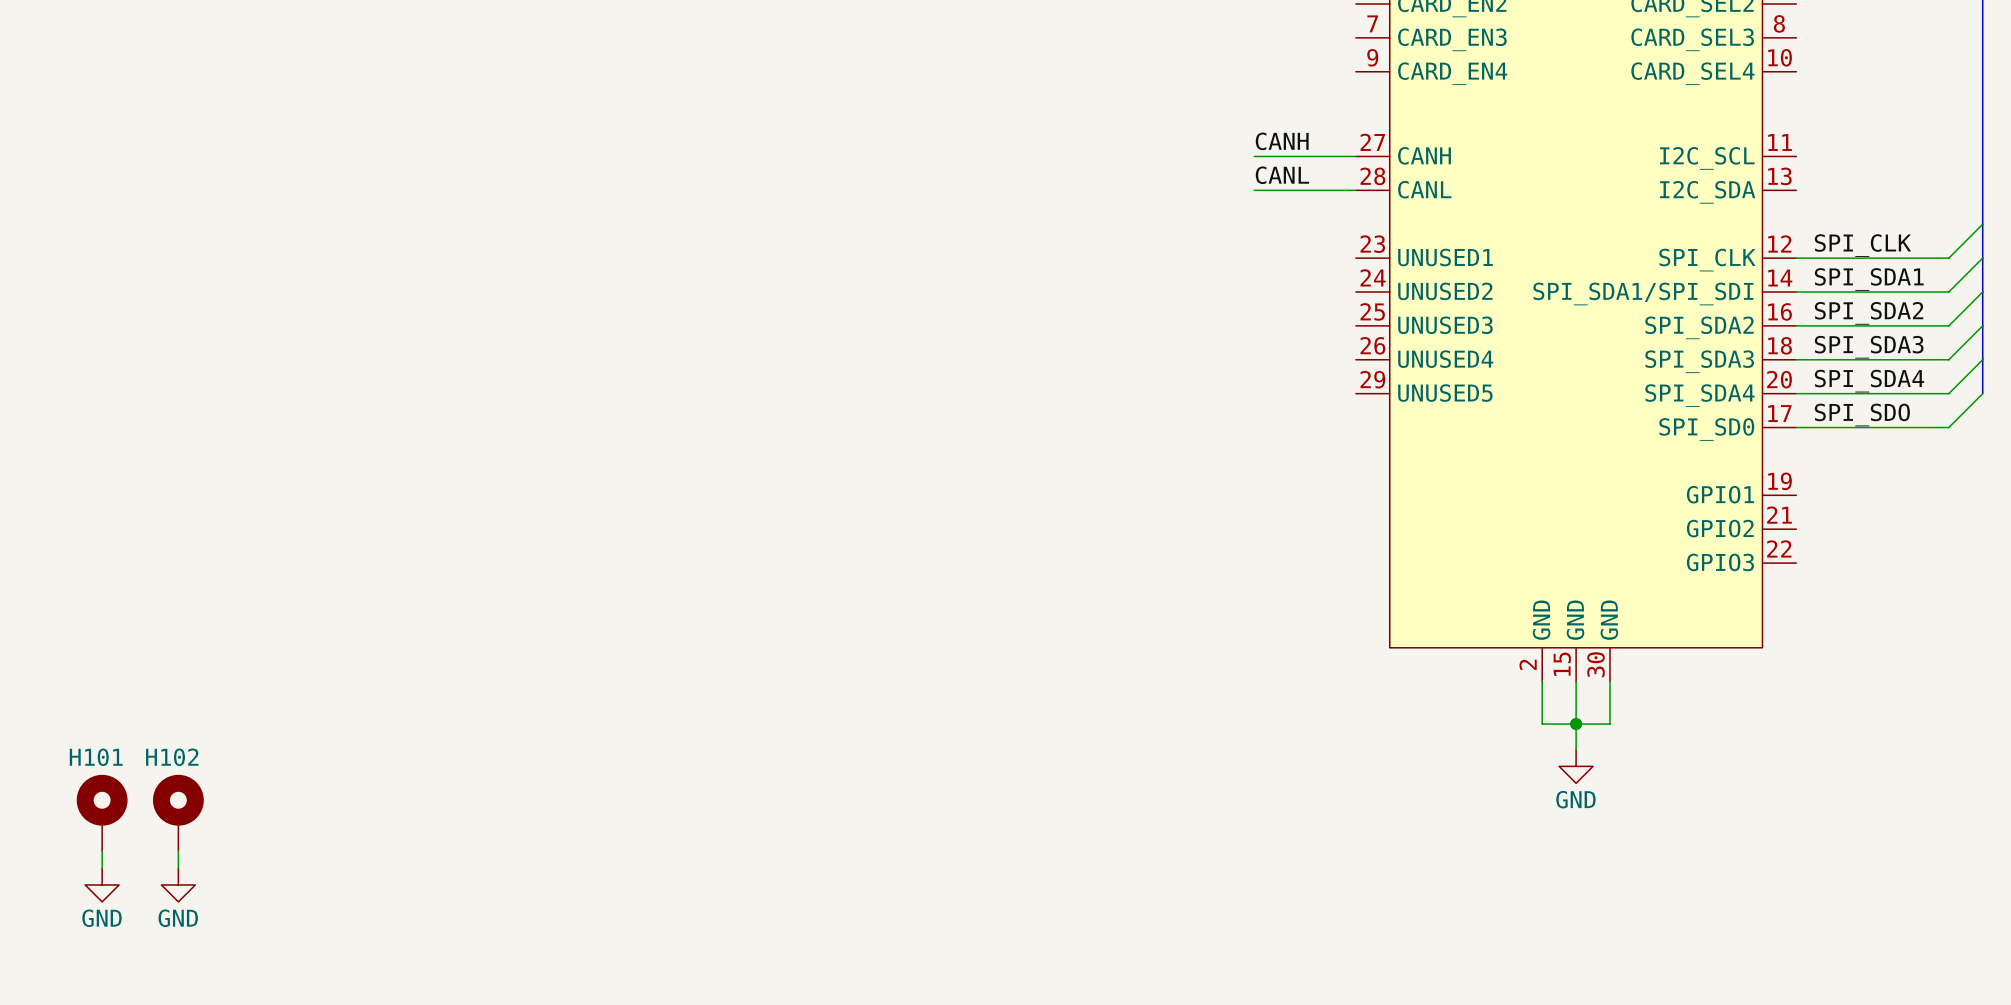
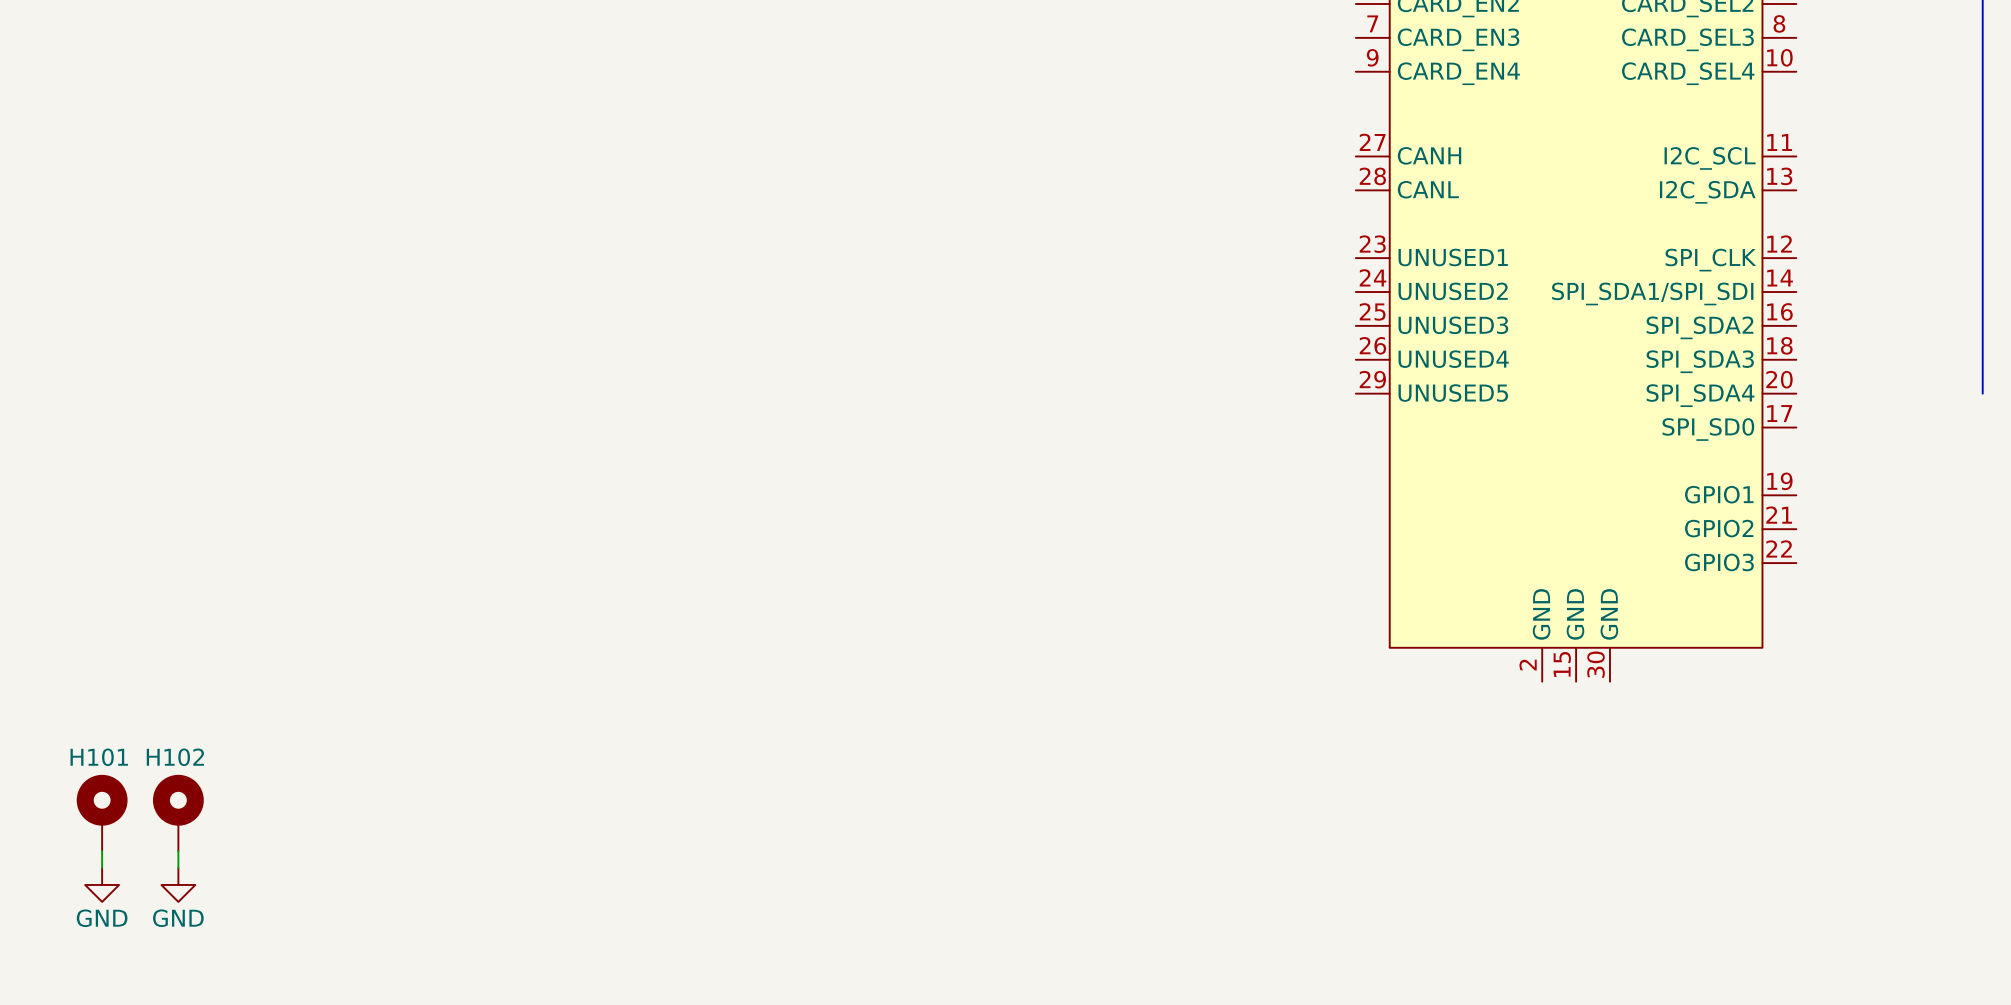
label: CANH (1282, 141) -> none
wire: (1254, 156) (1355, 156) -> none
label: CANL (1282, 175) -> none
wire: (1254, 190) (1355, 190) -> none
wire: (1982, 224) (1948, 258) (1796, 258) -> none
label: SPI_CLK (1863, 245) -> none
wire: (1982, 258) (1948, 292) (1796, 292) -> none
label: SPI_SDA1 (1869, 279) -> none
wire: (1982, 292) (1948, 325) (1796, 325) -> none
label: SPI_SDA2 (1869, 313) -> none
wire: (1982, 325) (1948, 359) (1796, 359) -> none
label: SPI_SDA3 (1869, 347) -> none
wire: (1982, 359) (1948, 393) (1796, 393) -> none
label: SPI_SDA4 (1869, 381) -> none
wire: (1982, 393) (1948, 427) (1796, 427) -> none
label: SPI_SDO (1862, 415) -> none
wire: (1542, 681) (1542, 724) (1609, 724) (1609, 681) -> none
wire: (1576, 681) (1576, 749) -> none
junction: (1576, 724) -> none
power symbol: GND (1576, 766) -> none

